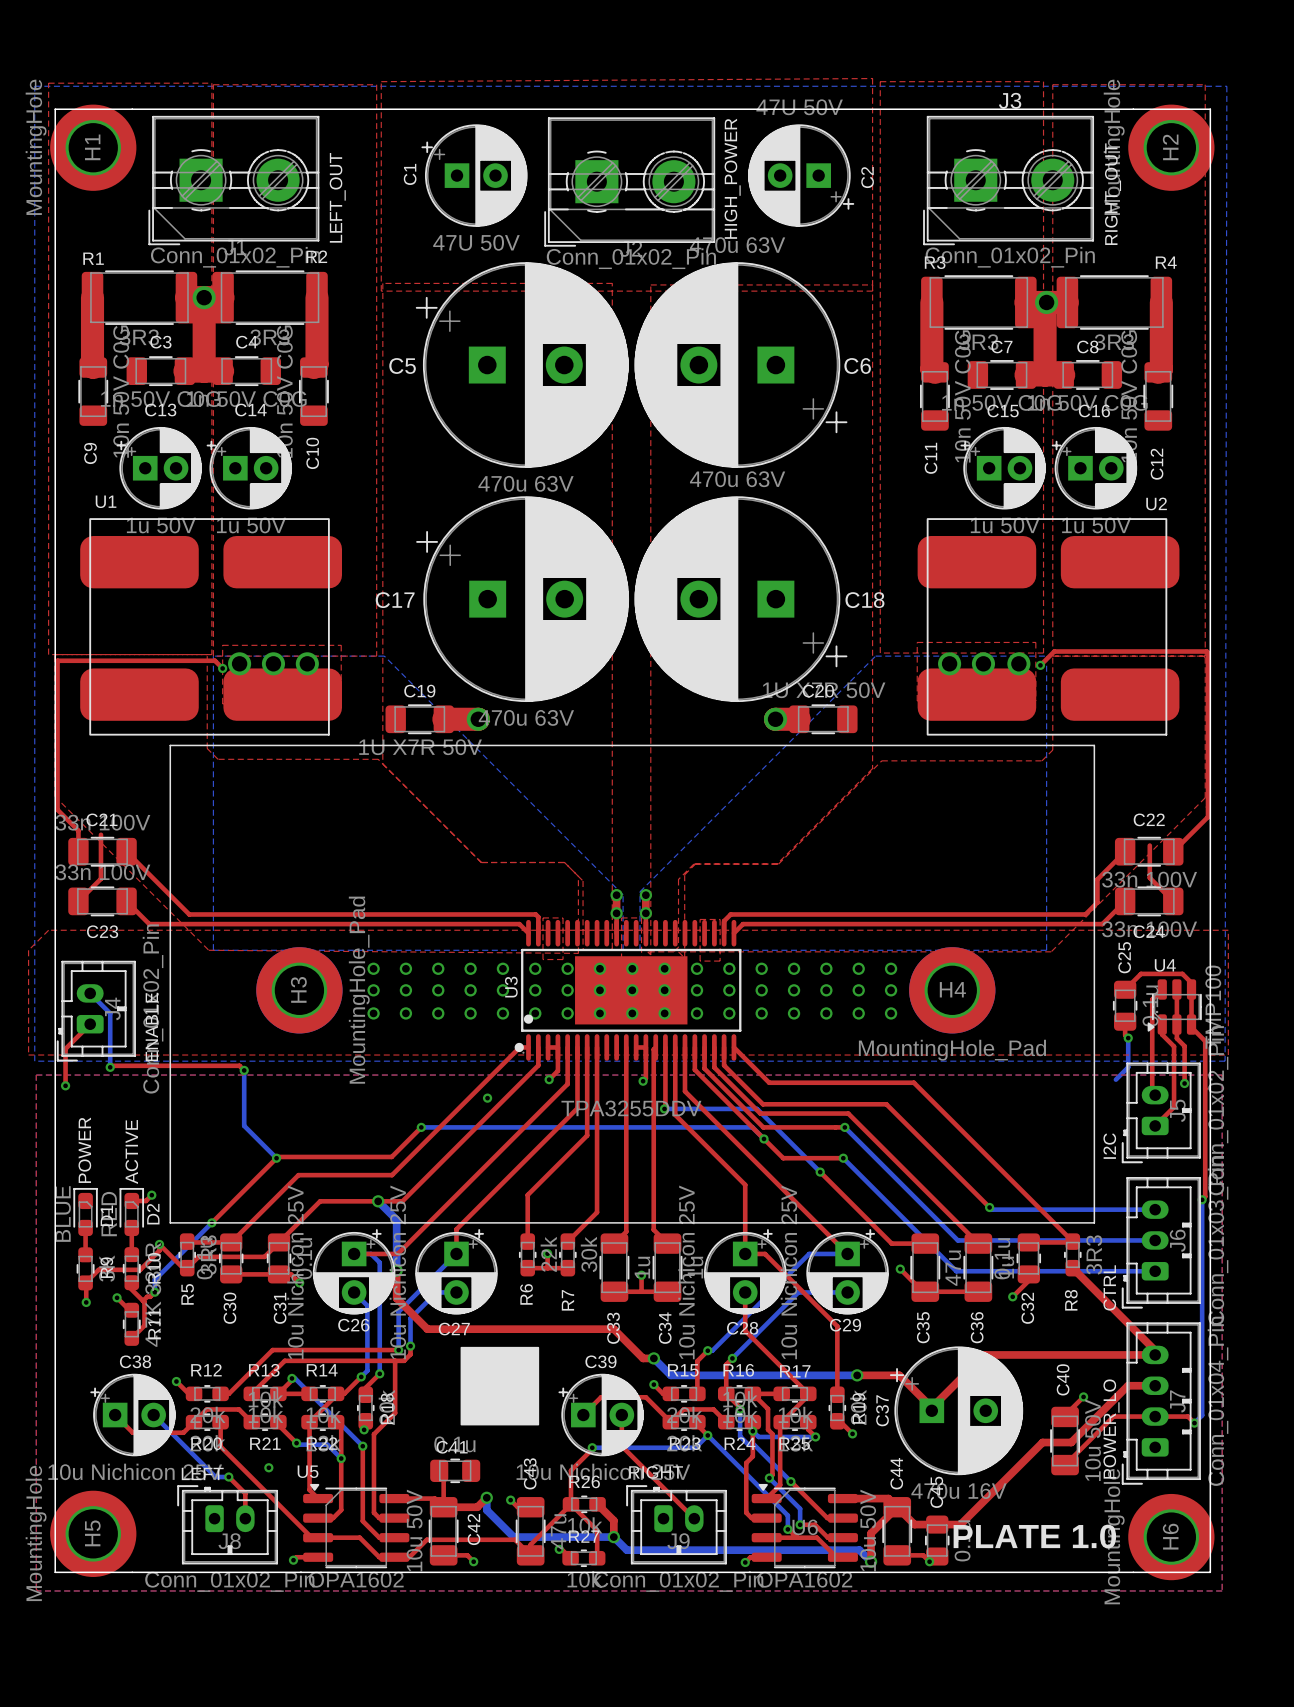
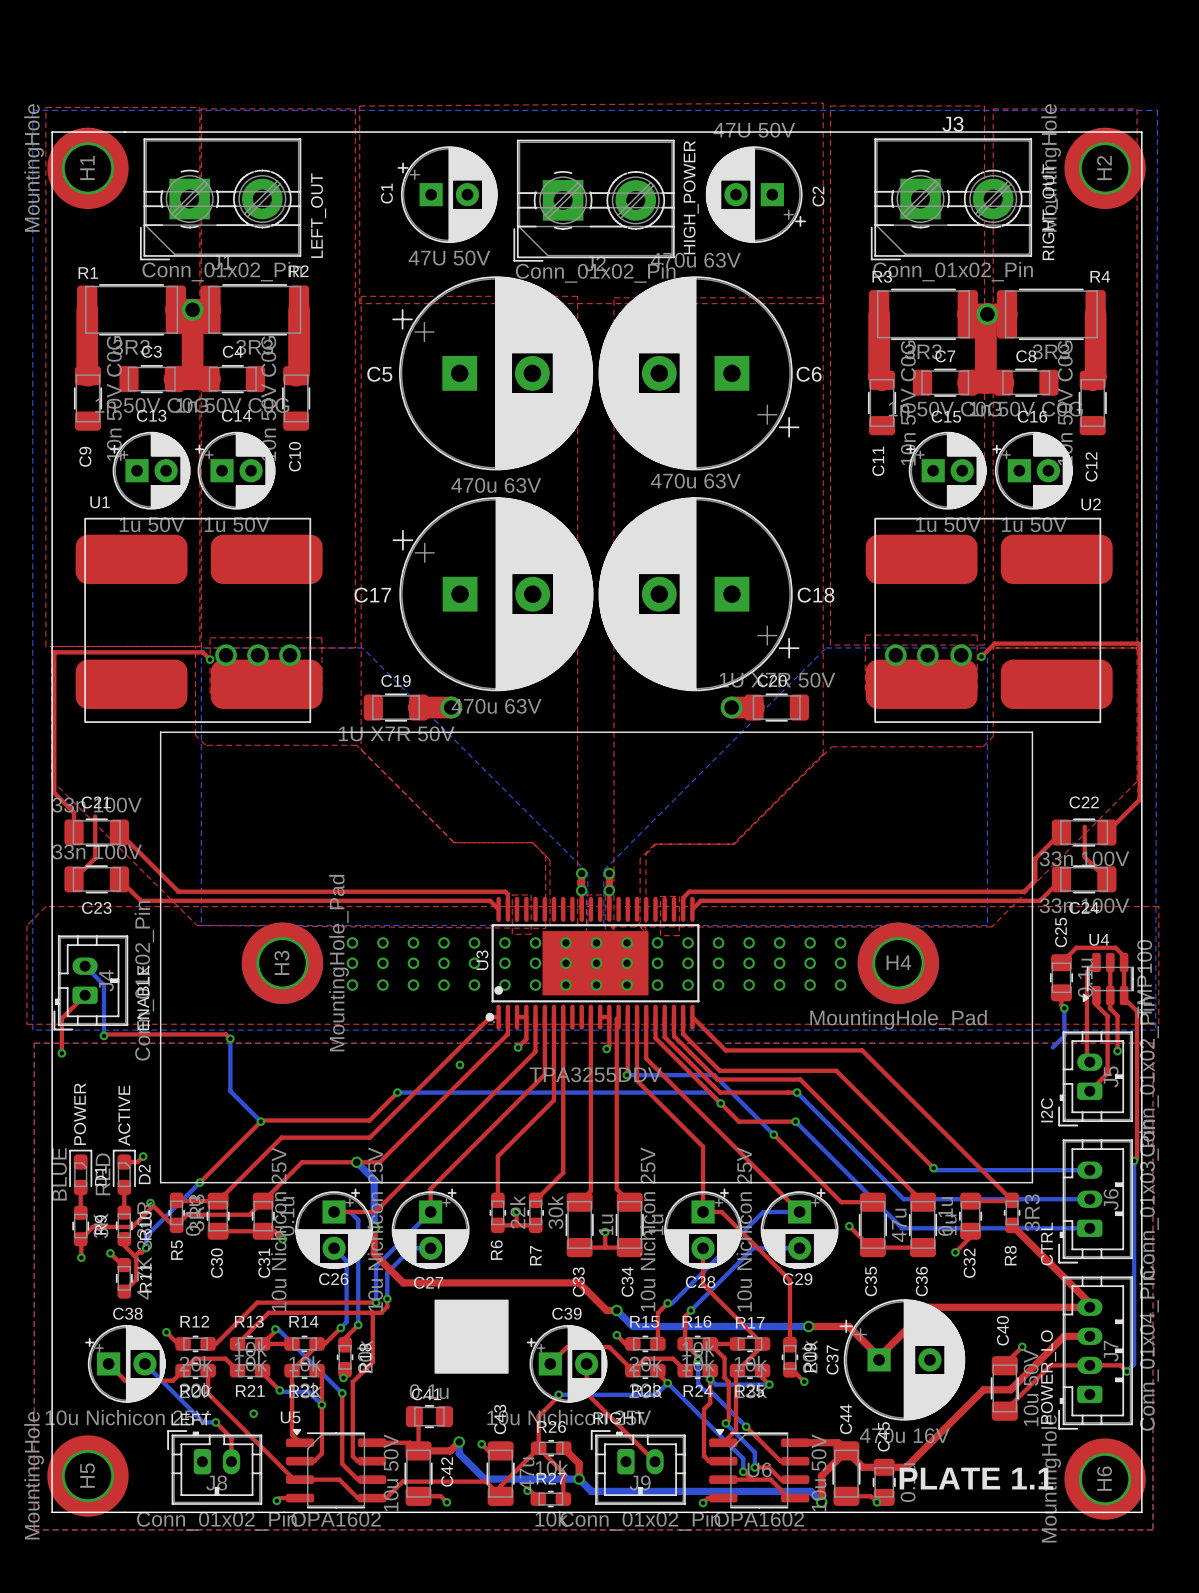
text: PLATE 1.0 (1034, 1536) -> PLATE 1.1 (976, 1478)

